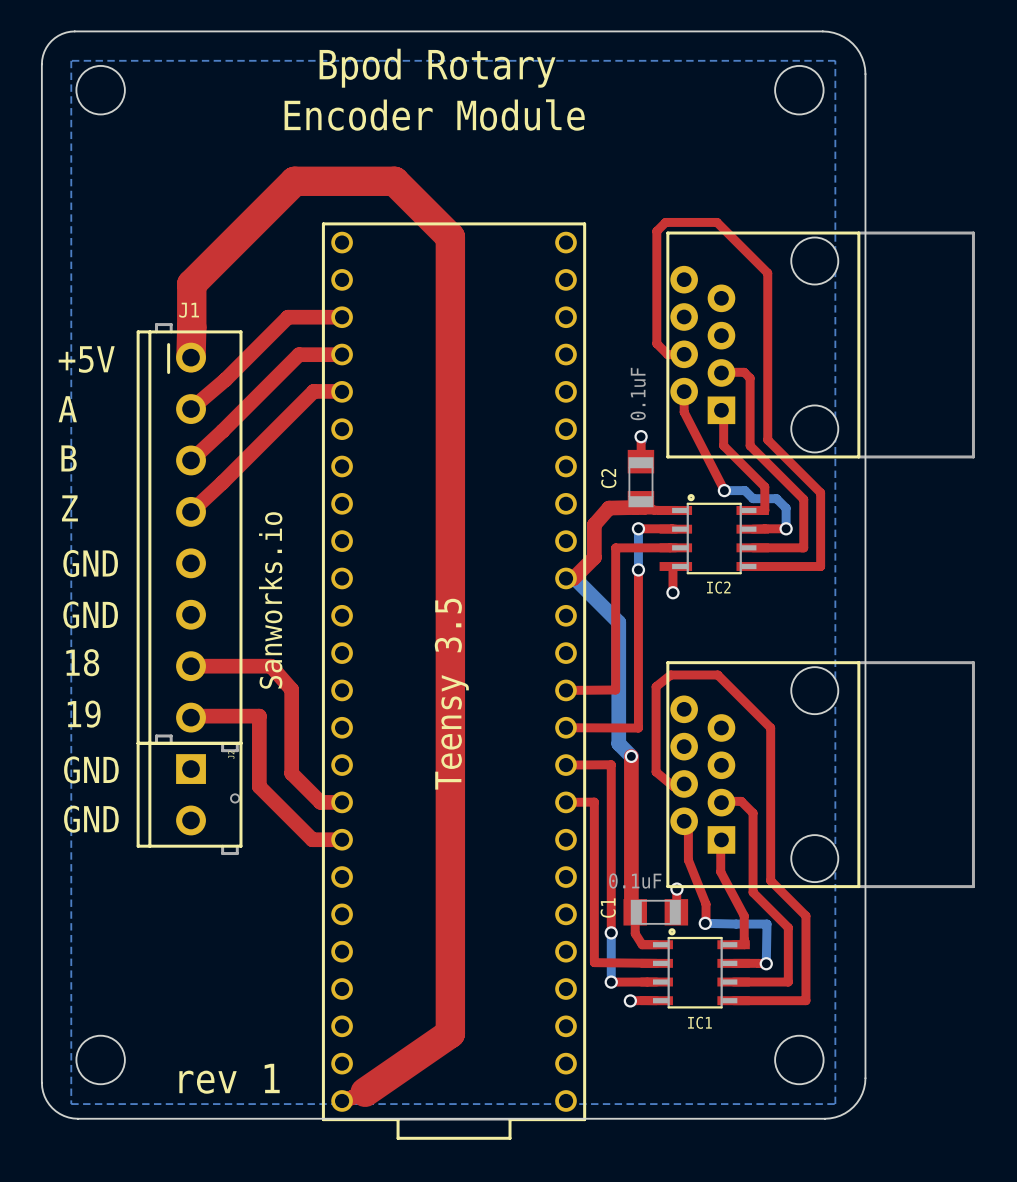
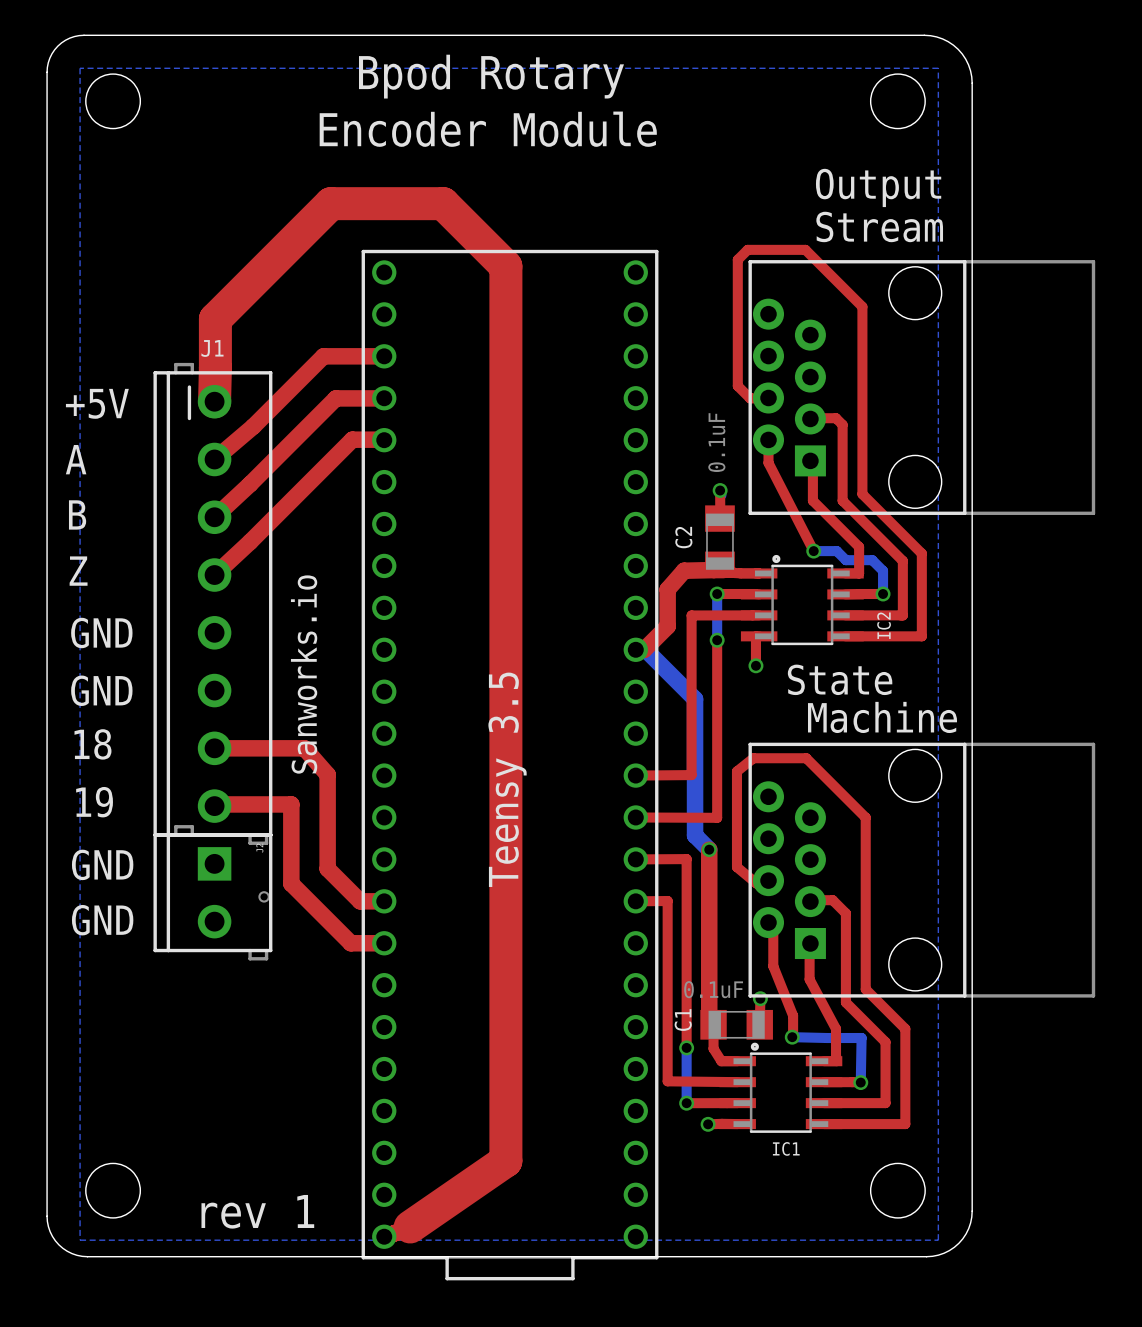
text: none -> Output (878, 187)
text: none -> Stream (879, 226)
IC2 name rotation: 0° (718, 587) -> 90° counterclockwise (884, 625)
IC2 name position: IC2 (718, 587) -> IC2 (884, 625)
text: none -> State (840, 679)
text: none -> Machine (882, 717)

